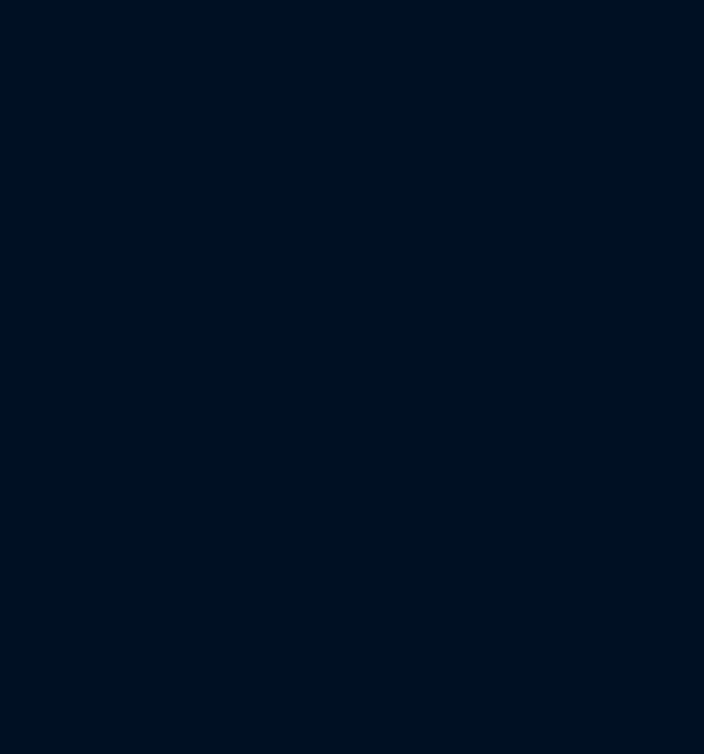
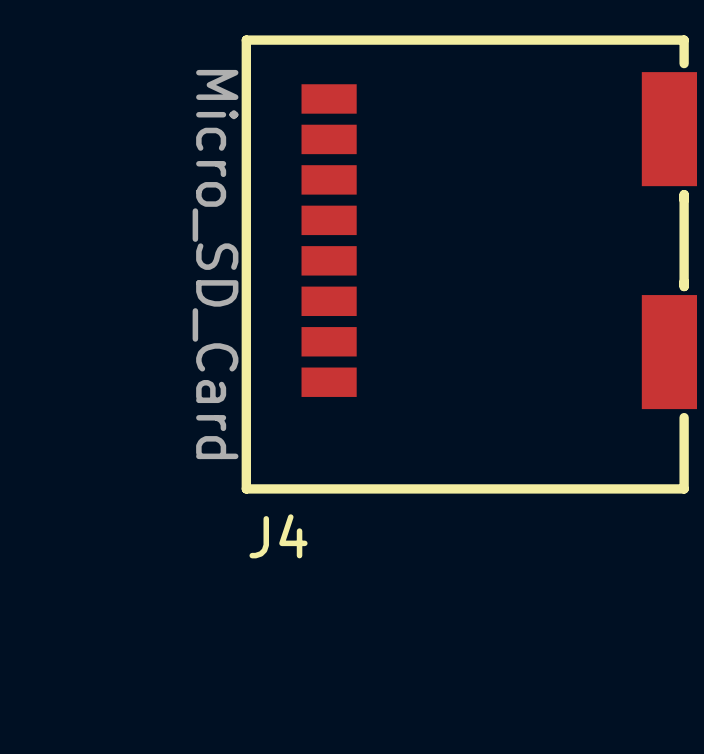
J4: none -> Micro_SD_Card (469, 264)

